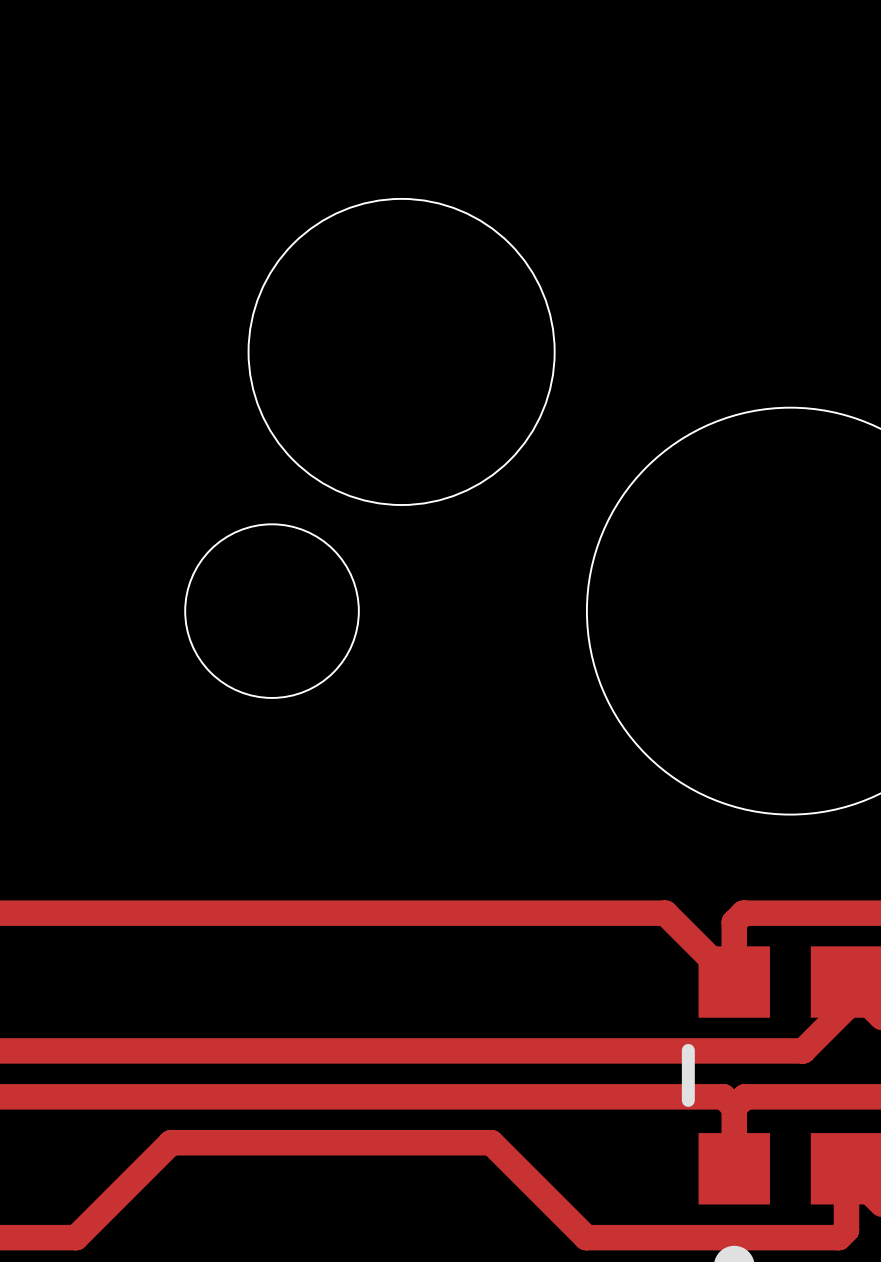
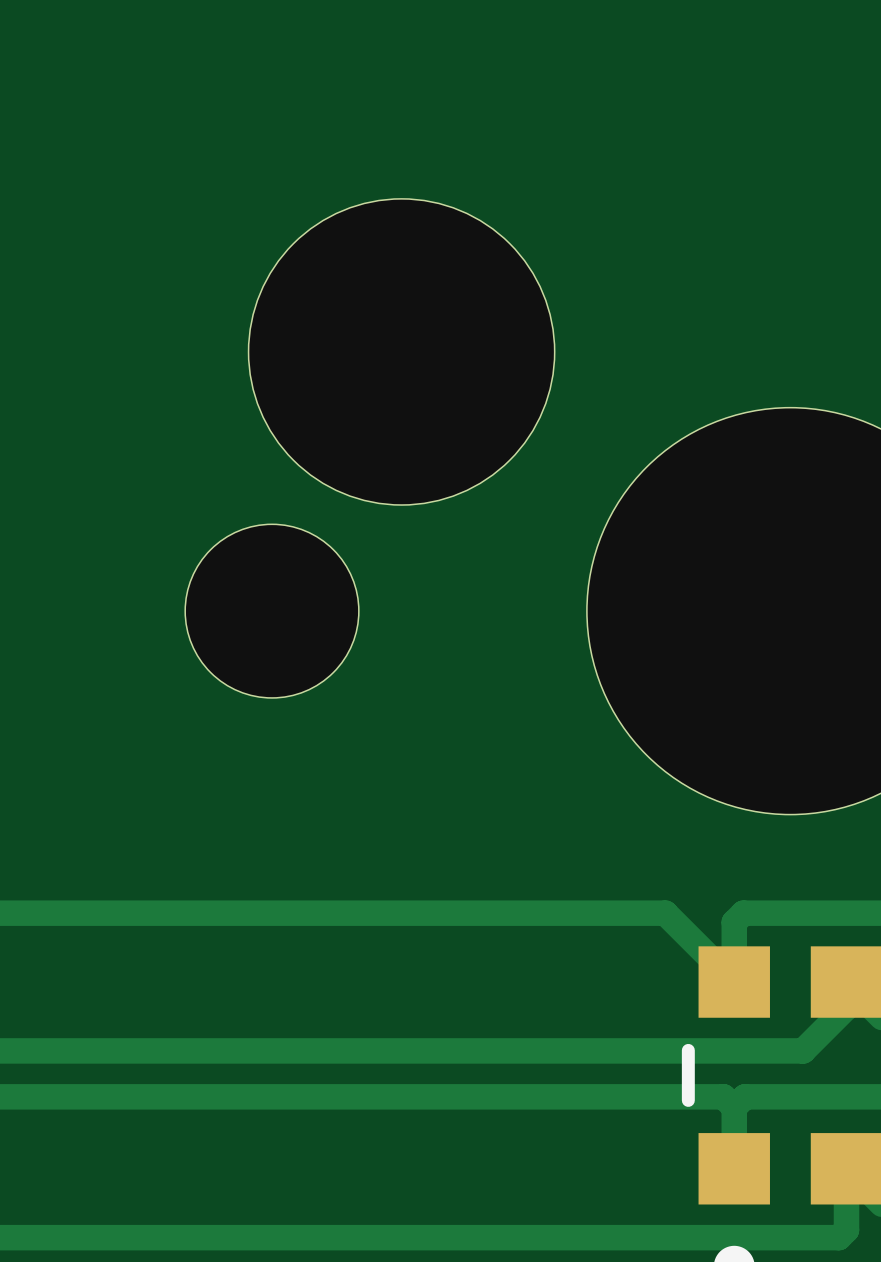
track: (76, 1237) (171, 1142) (491, 1142) (586, 1237) -> (76, 1237) (586, 1237)

